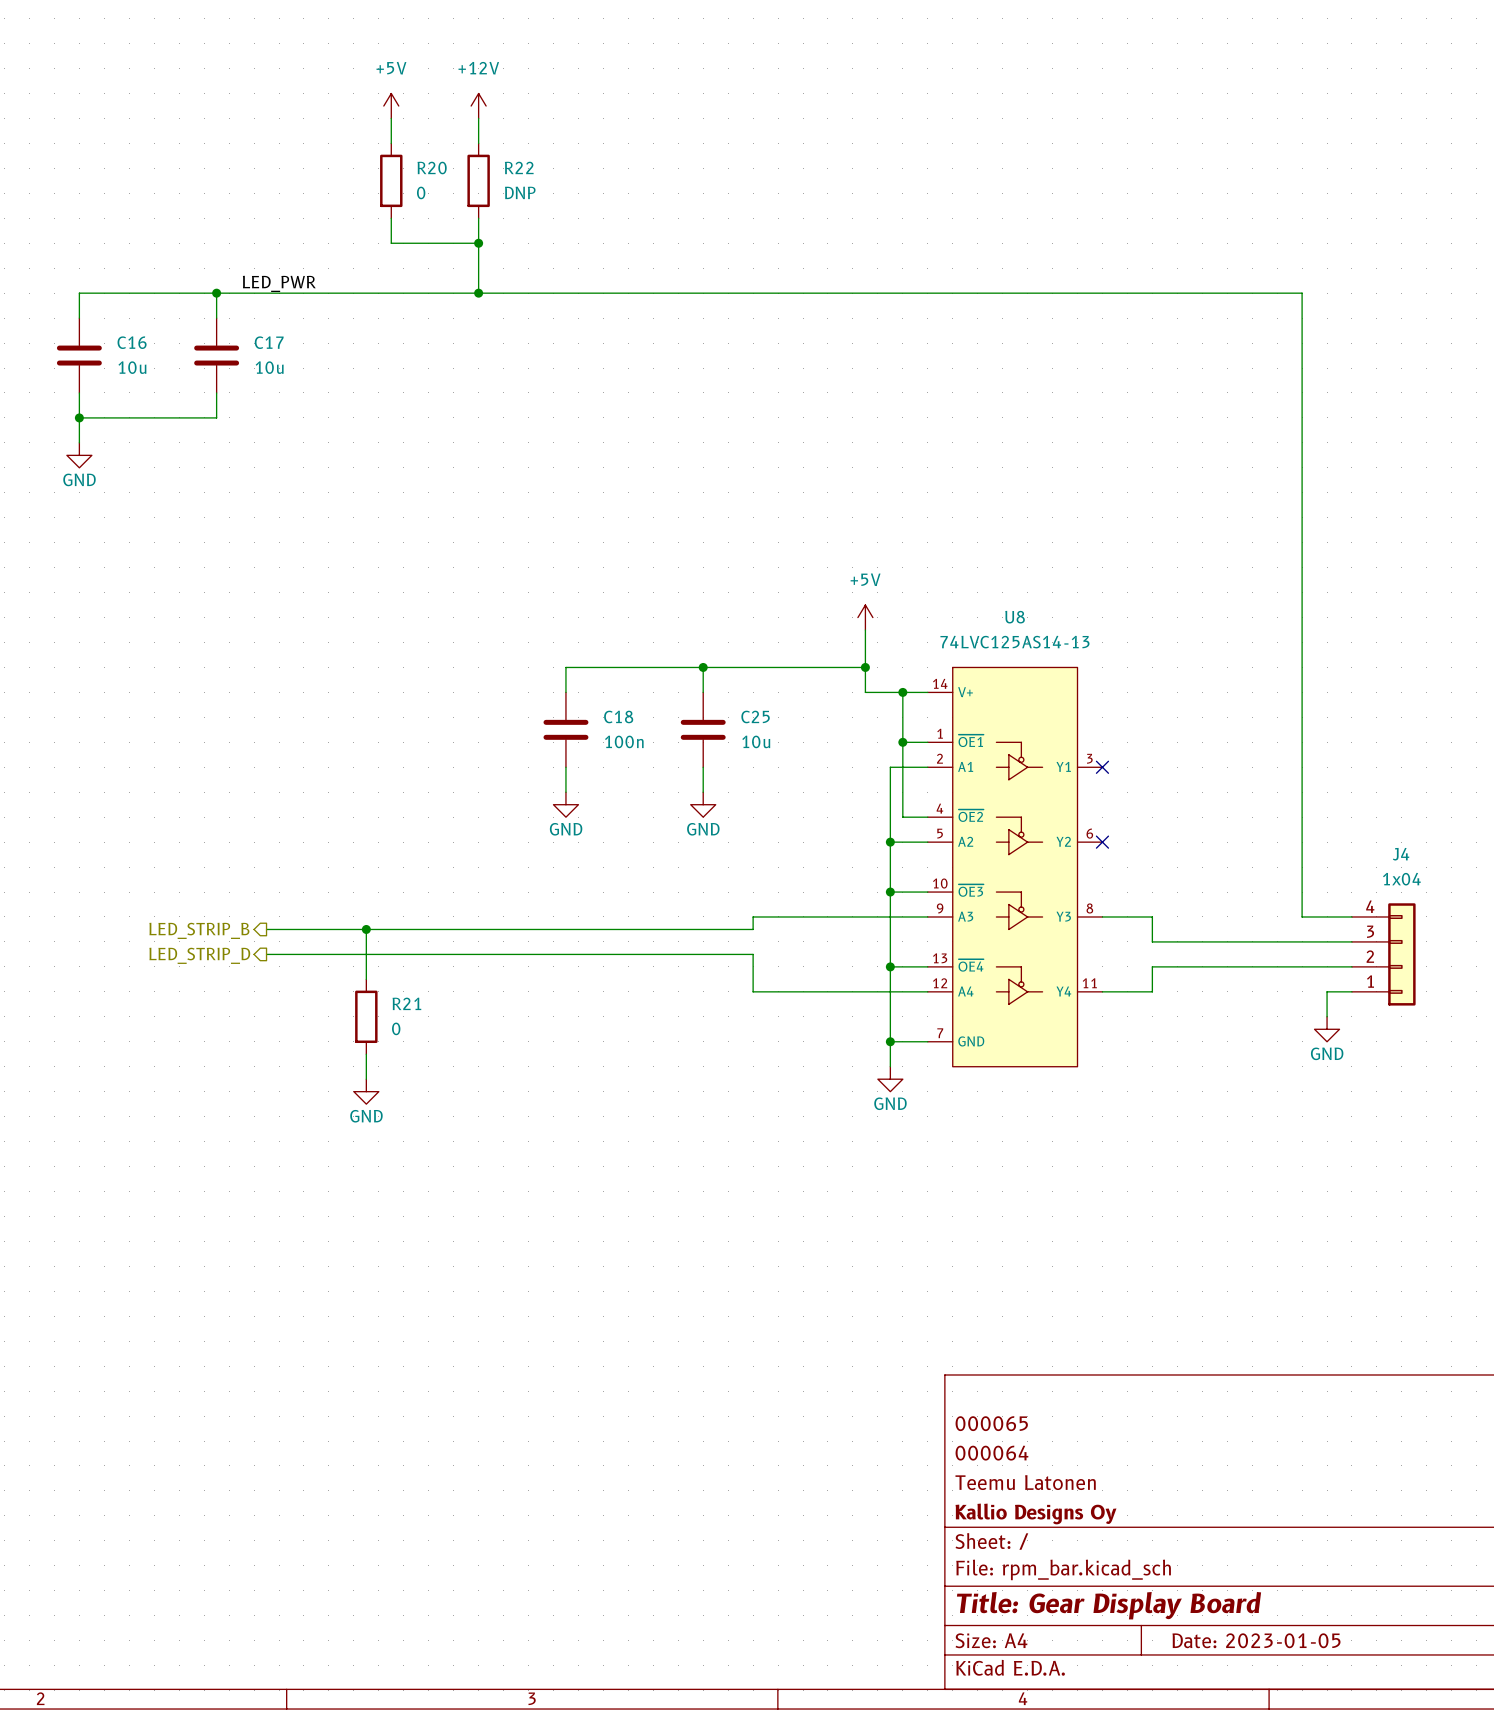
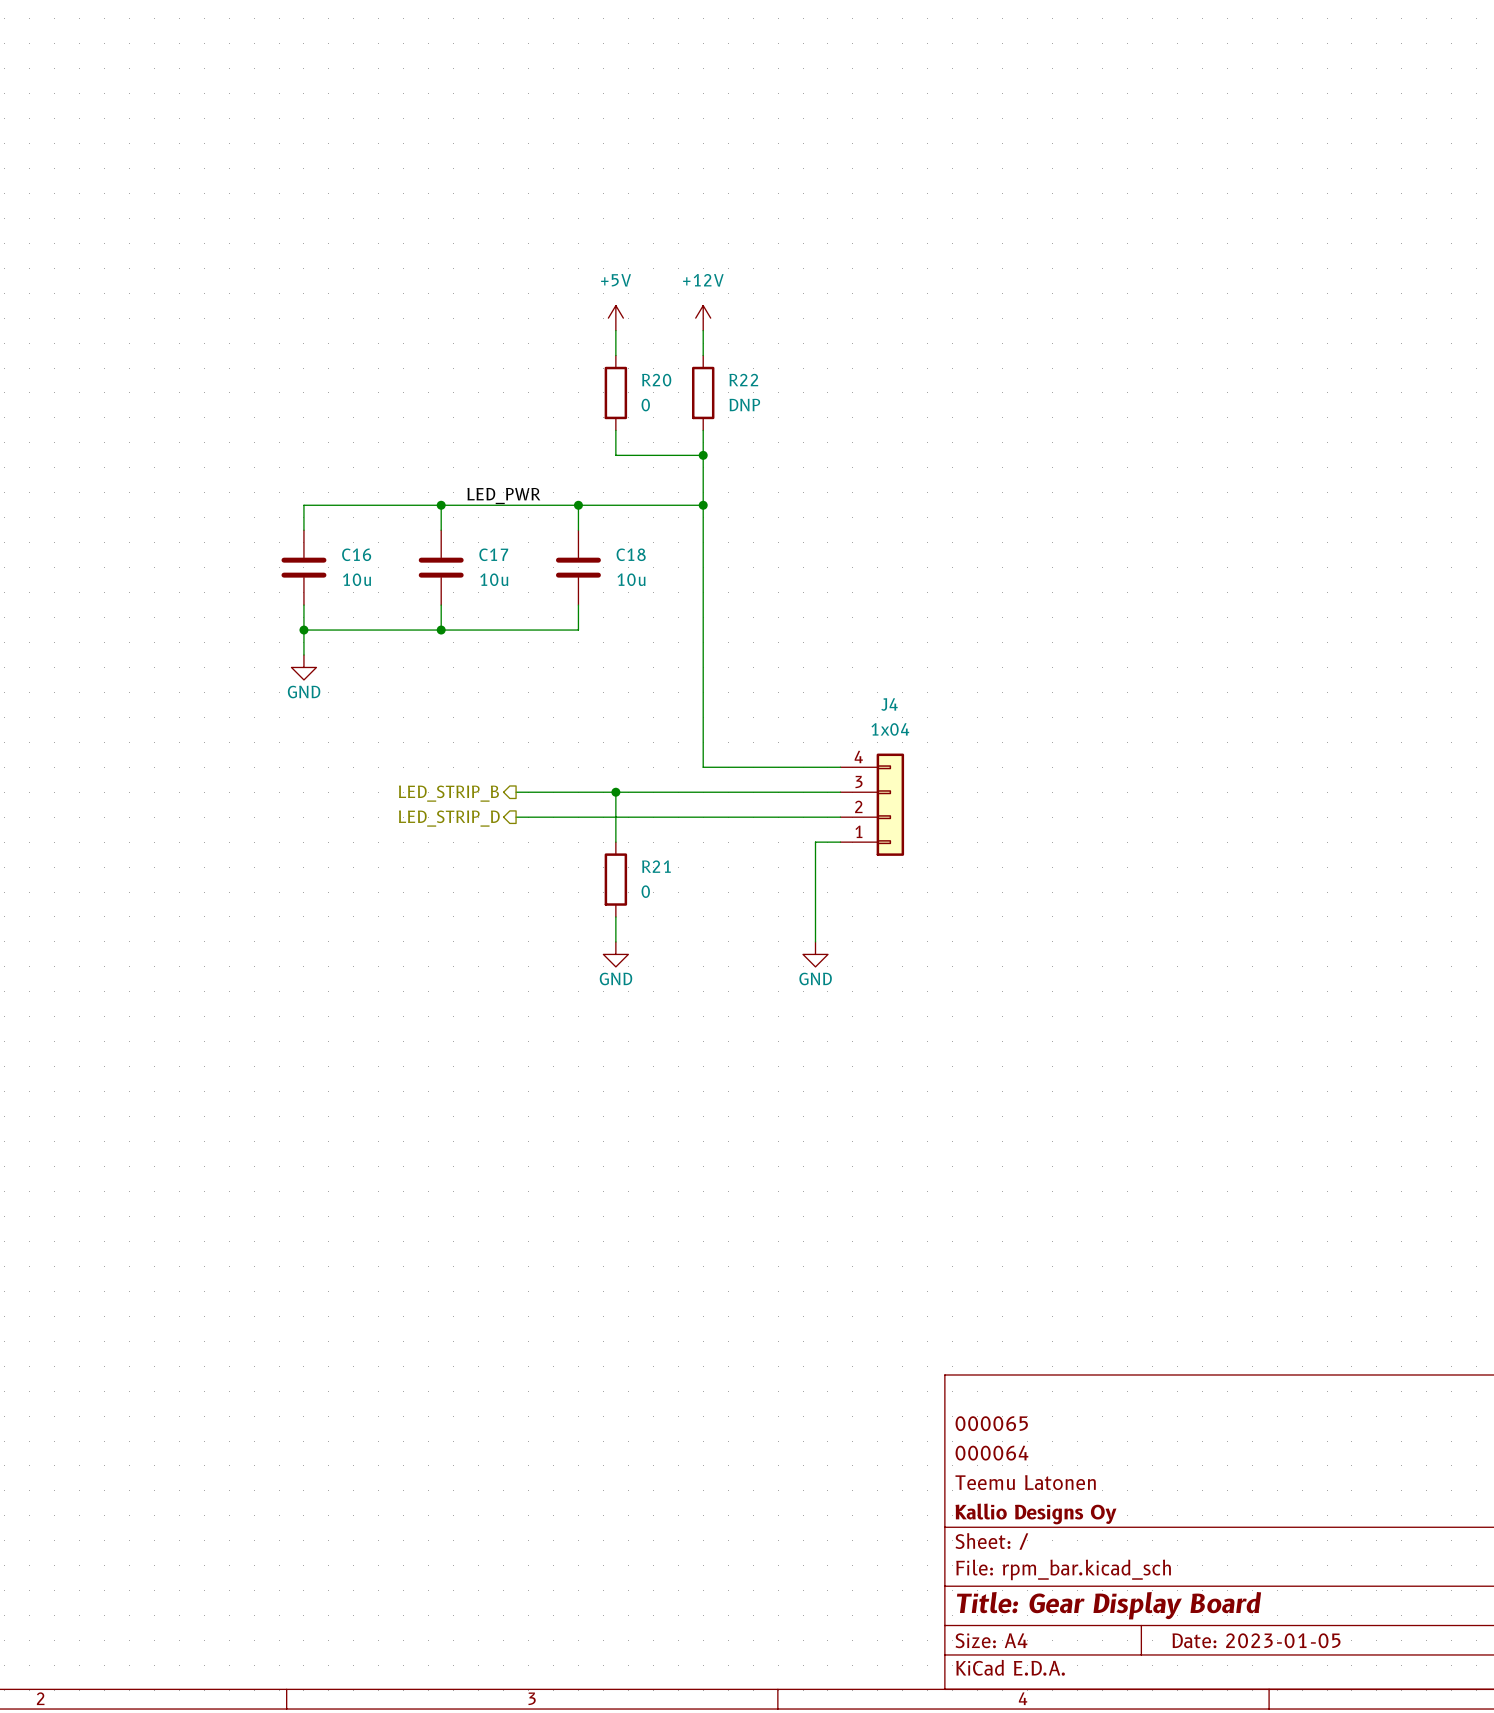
power symbol: +5V (391, 106) -> none
power symbol: +12V (478, 106) -> none
wire: (391, 118) (391, 143) -> none
wire: (478, 118) (478, 143) -> none
R20 position: (391, 180) -> (615, 392)
R22 position: (478, 180) -> (703, 392)
wire: (391, 218) (391, 243) (478, 243) -> none
wire: (478, 218) (478, 293) -> none
junction: (478, 243) -> none
label: LED_PWR (279, 283) -> none
wire: (216, 293) (216, 318) -> none
junction: (216, 293) -> none
junction: (478, 293) -> none
wire: (79, 318) (79, 293) (1302, 293) (1302, 916) (1351, 916) -> none
power symbol: none -> +5V (615, 318)
power symbol: none -> +12V (703, 318)
wire: none -> (615, 330) (615, 355)
wire: none -> (703, 330) (703, 355)
C16 position: (79, 355) -> (303, 567)
C17 position: (216, 355) -> (441, 567)
wire: (79, 392) (79, 442) -> none
wire: (216, 392) (216, 417) (79, 417) -> none
junction: (79, 417) -> none
wire: none -> (615, 430) (615, 455) (703, 455)
wire: none -> (703, 430) (703, 667)
power symbol: GND (79, 455) -> none
junction: none -> (703, 455)
label: none -> LED_PWR (503, 496)
wire: none -> (441, 505) (441, 530)
junction: none -> (441, 505)
wire: none -> (578, 505) (578, 530)
junction: none -> (578, 505)
wire: none -> (703, 505) (303, 505) (303, 530)
junction: none -> (703, 505)
wire: none -> (303, 605) (303, 654)
wire: none -> (441, 605) (441, 630)
wire: none -> (578, 605) (578, 630) (303, 630)
power symbol: +5V (865, 617) -> none
junction: none -> (303, 630)
junction: none -> (441, 630)
wire: (865, 630) (865, 692) (927, 692) -> none
power symbol: none -> GND (303, 667)
junction: (703, 667) -> none
wire: (865, 667) (565, 667) (565, 692) -> none
junction: (865, 667) -> none
wire: none -> (703, 692) (703, 767) (840, 767)
wire: (902, 692) (902, 817) (927, 817) -> none
junction: (902, 692) -> none
C18 position: (565, 729) -> (578, 567)
C25: (703, 729) -> none
C18 text: 100n (624, 741) -> 10u (631, 579)
wire: (902, 742) (927, 742) -> none
junction: (902, 742) -> none
wire: (565, 767) (565, 792) -> (615, 916) (615, 941)
wire: (703, 767) (703, 792) -> none
wire: (927, 767) (890, 767) (890, 1066) -> none
no-connect mark: (1102, 767) -> none
wire: none -> (516, 792) (840, 792)
wire: none -> (615, 792) (615, 842)
junction: none -> (615, 792)
hierarchical label: none -> LED_STRIP_B (448, 793)
power symbol: GND (565, 804) -> none
power symbol: GND (703, 804) -> none
wire: none -> (516, 817) (840, 817)
hierarchical label: none -> LED_STRIP_D (449, 818)
wire: none -> (840, 842) (815, 842) (815, 941)
wire: (890, 842) (927, 842) -> none
junction: (890, 842) -> none
no-connect mark: (1102, 842) -> none
U8: (1015, 867) -> none
wire: (890, 892) (927, 892) -> none
junction: (890, 892) -> none
wire: (927, 916) (753, 916) (753, 929) (266, 929) -> none
wire: (1102, 916) (1152, 916) (1152, 941) (1351, 941) -> none
wire: (366, 929) (366, 979) -> none
junction: (366, 929) -> none
hierarchical label: LED_STRIP_B (199, 930) -> none
wire: (266, 954) (753, 954) (753, 991) (927, 991) -> none
power symbol: none -> GND (615, 954)
power symbol: none -> GND (815, 954)
J4 position: (1383, 954) -> (872, 804)
hierarchical label: LED_STRIP_D (199, 955) -> none
wire: (890, 966) (927, 966) -> none
junction: (890, 966) -> none
wire: (1351, 966) (1152, 966) (1152, 991) (1102, 991) -> none
wire: (1351, 991) (1327, 991) (1327, 1016) -> none
R21 position: (366, 1016) -> (615, 879)
power symbol: GND (1327, 1029) -> none
wire: (890, 1041) (927, 1041) -> none
junction: (890, 1041) -> none
wire: (366, 1054) (366, 1079) -> none
power symbol: GND (890, 1079) -> none
power symbol: GND (366, 1091) -> none

